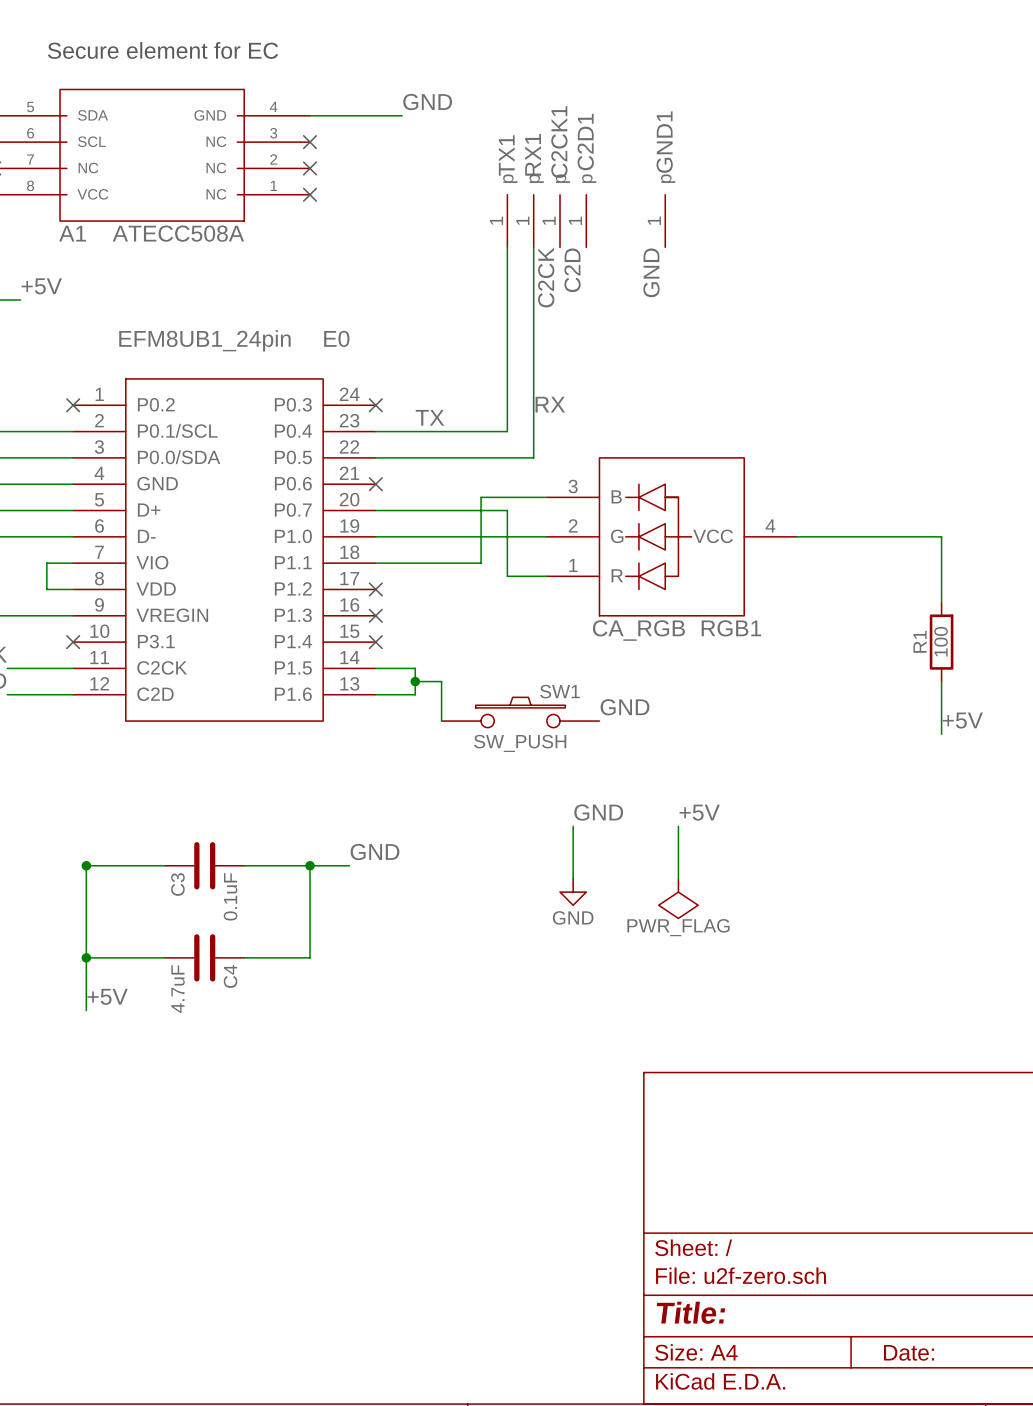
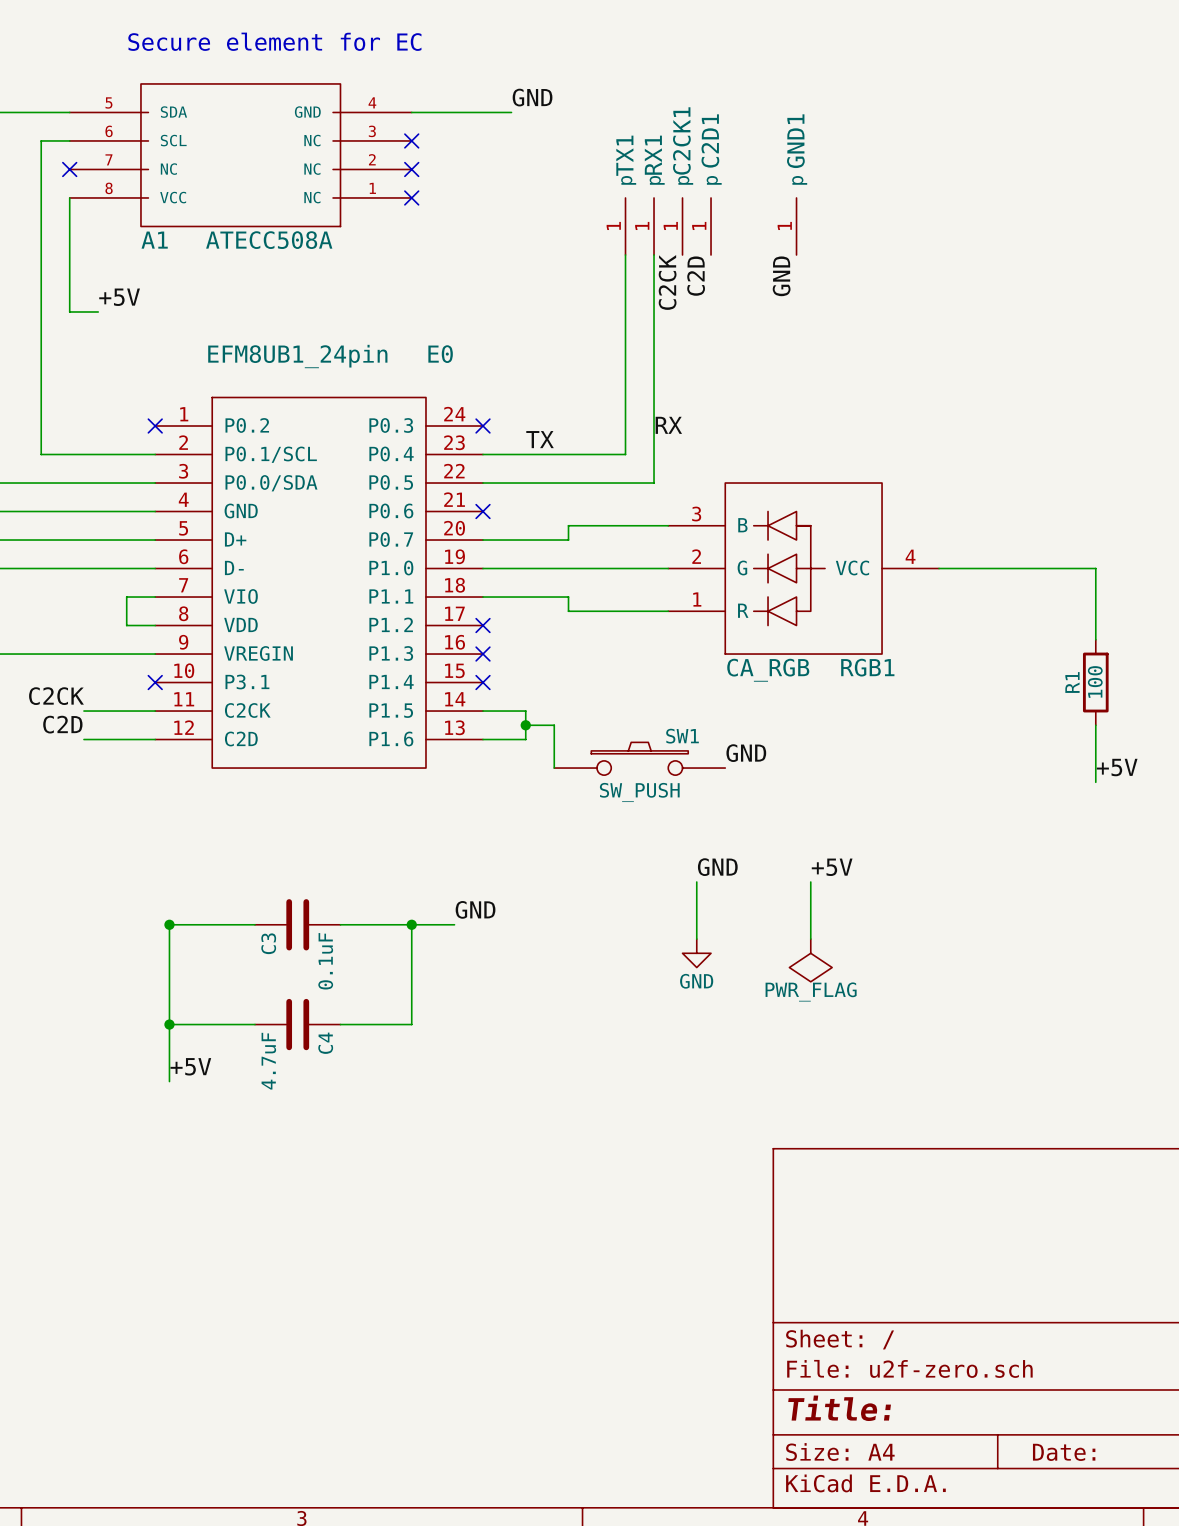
wire: (481, 497) (481, 563) (454, 563) -> (597, 525) (568, 525) (568, 540)
wire: (454, 510) (507, 510) (507, 576) -> (568, 597) (568, 611) (625, 611)

